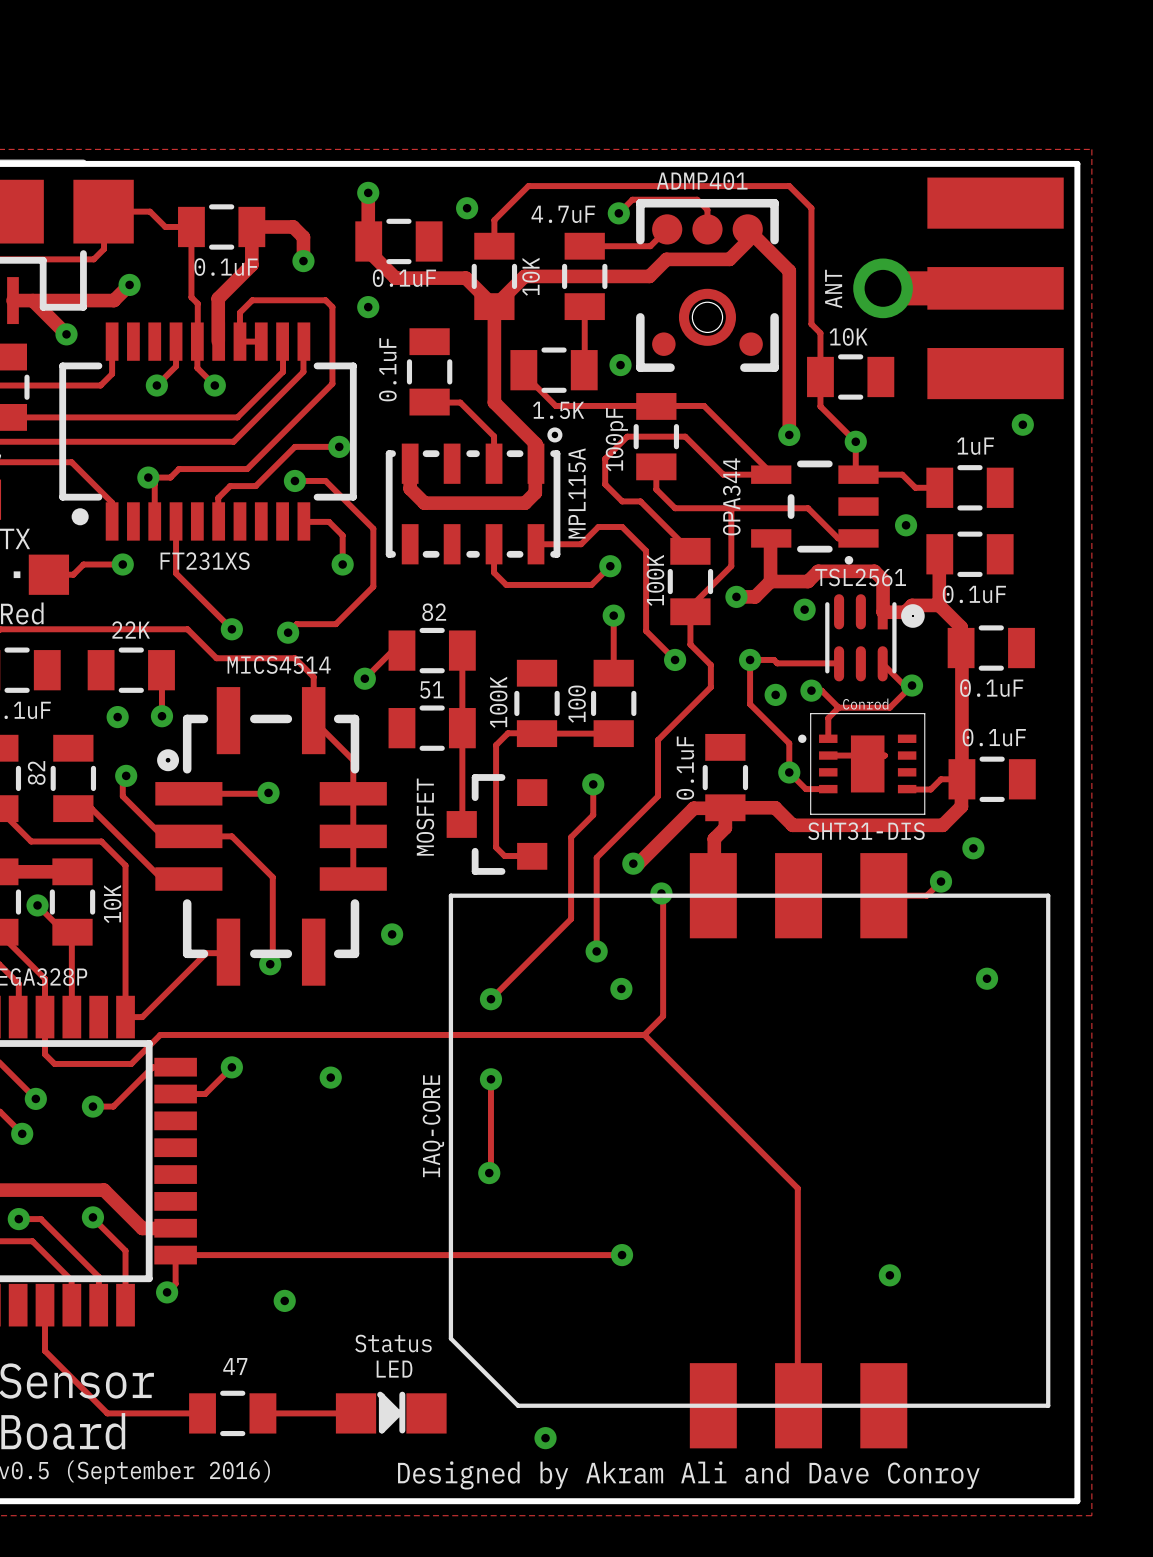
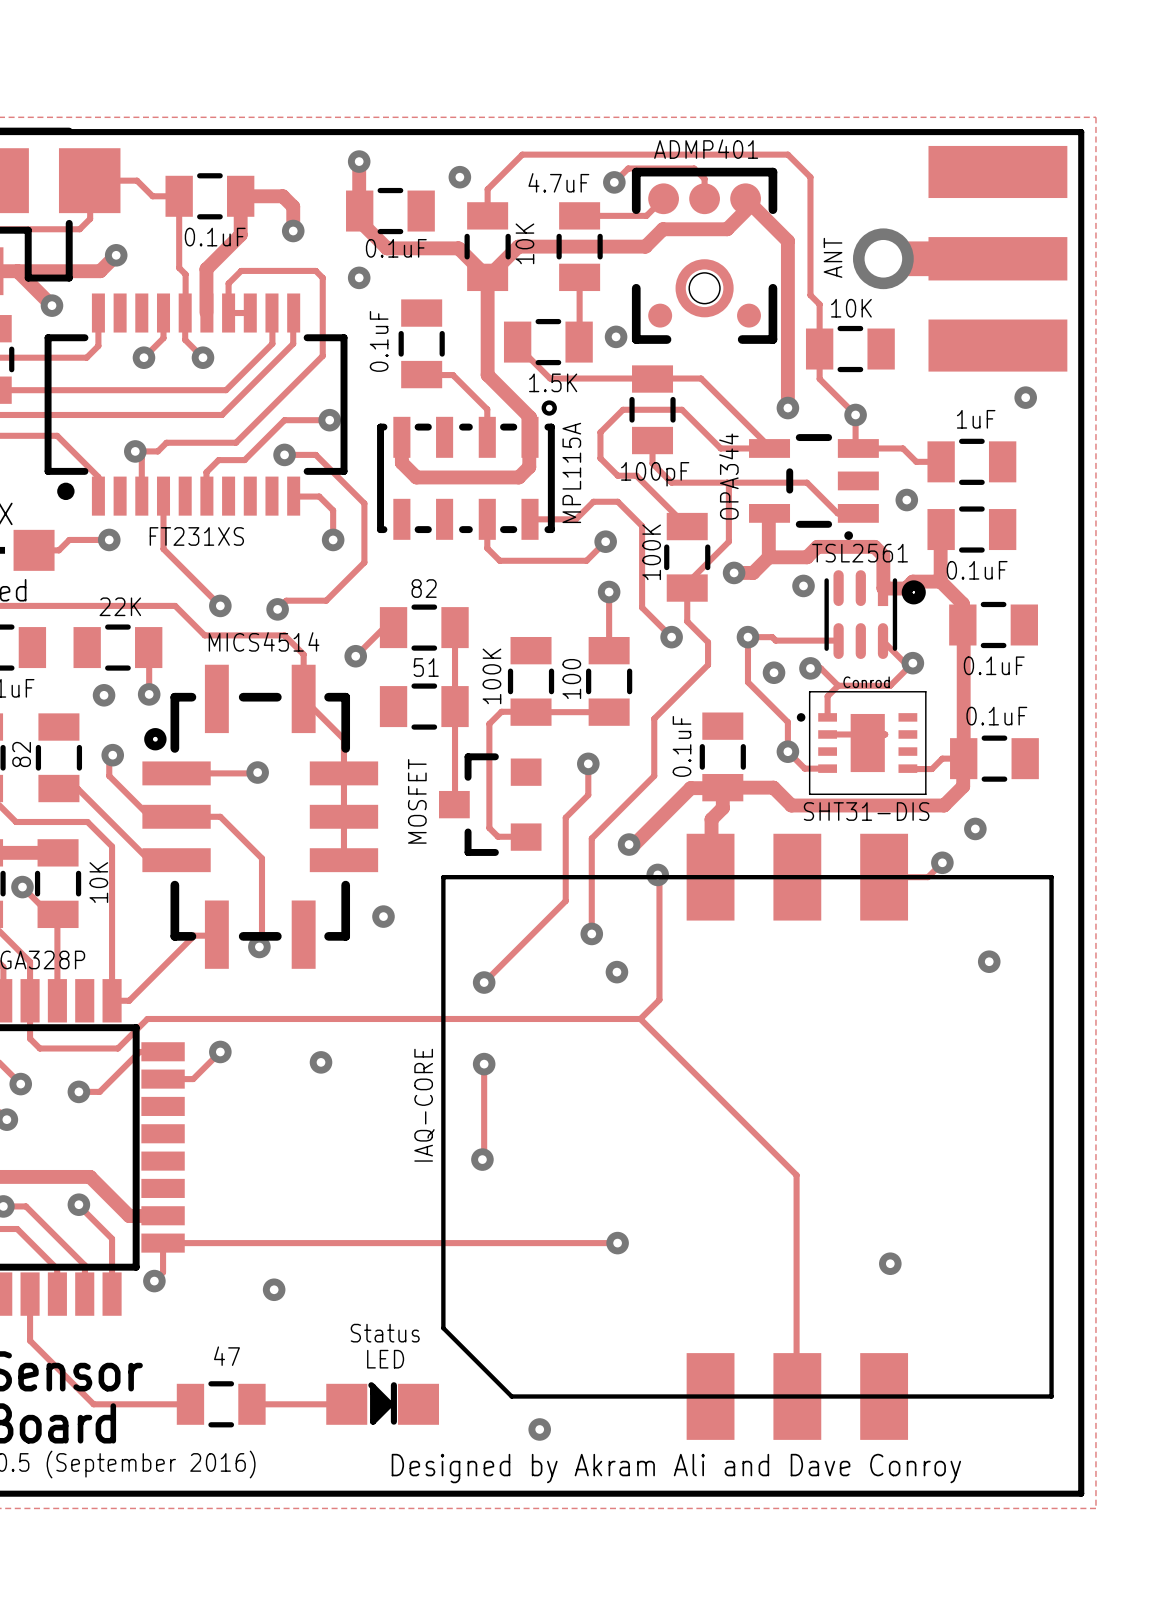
part value rotation: 0° (616, 439) -> 90° clockwise (655, 474)
part value position: 100pF (616, 439) -> 100pF (655, 474)

